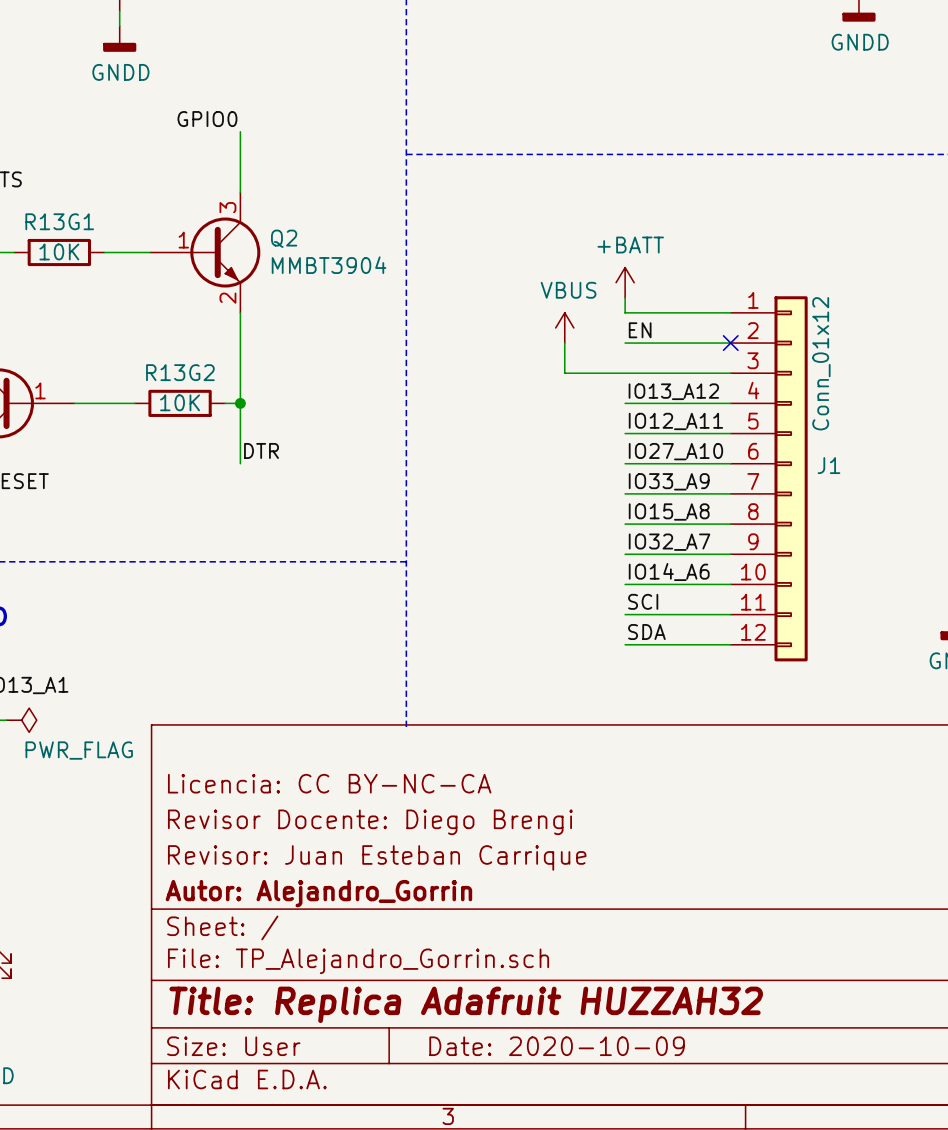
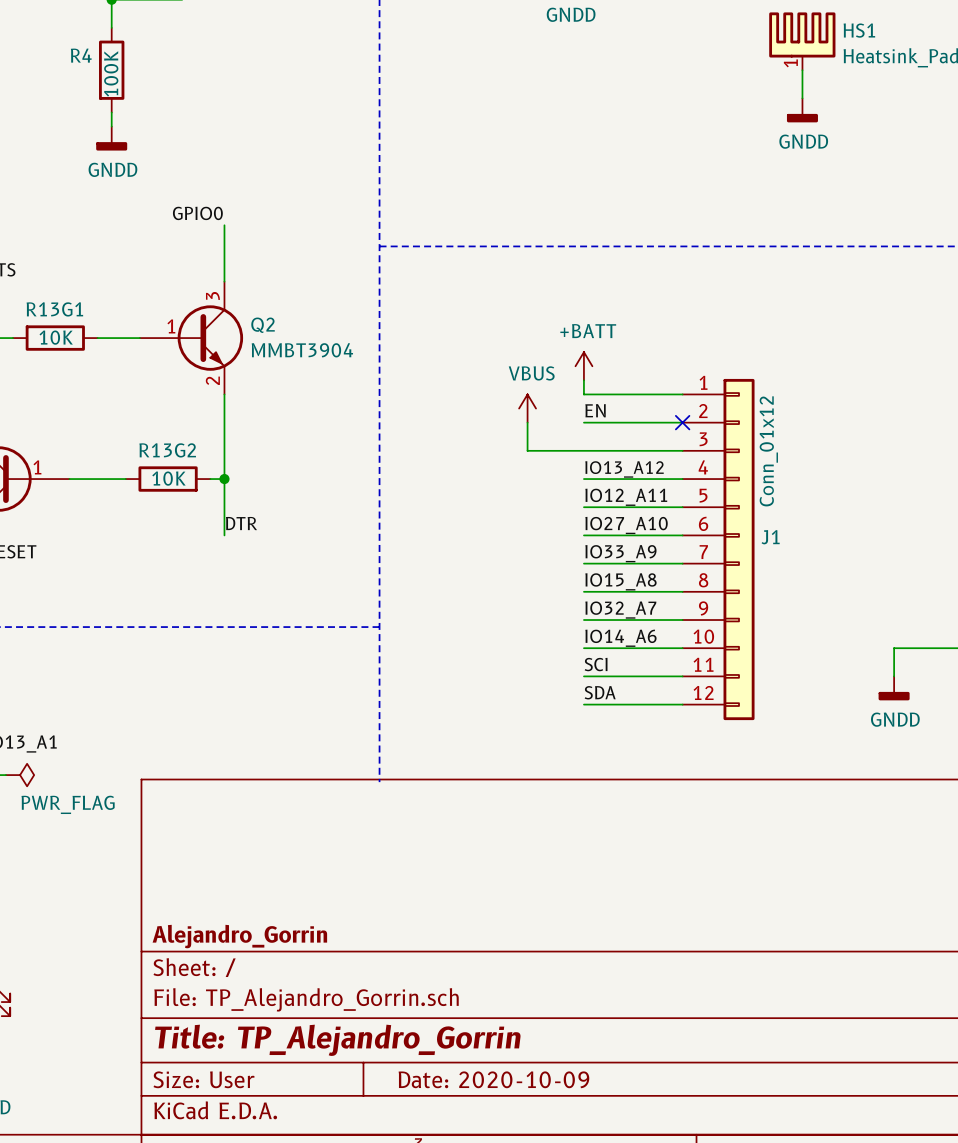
title block: Licencia: CC BY-NC-CA (329, 783) -> none
title block: Revisor Docente: Diego Brengi (370, 822) -> none
title block: Revisor: Juan Esteban Carrique (377, 857) -> none
title block: Autor: Alejandro_Gorrin (318, 893) -> Alejandro_Gorrin (239, 936)
title block: Title: Replica Adafruit HUZZAH32 (466, 1004) -> Title: TP_Alejandro_Gorrin (337, 1040)

